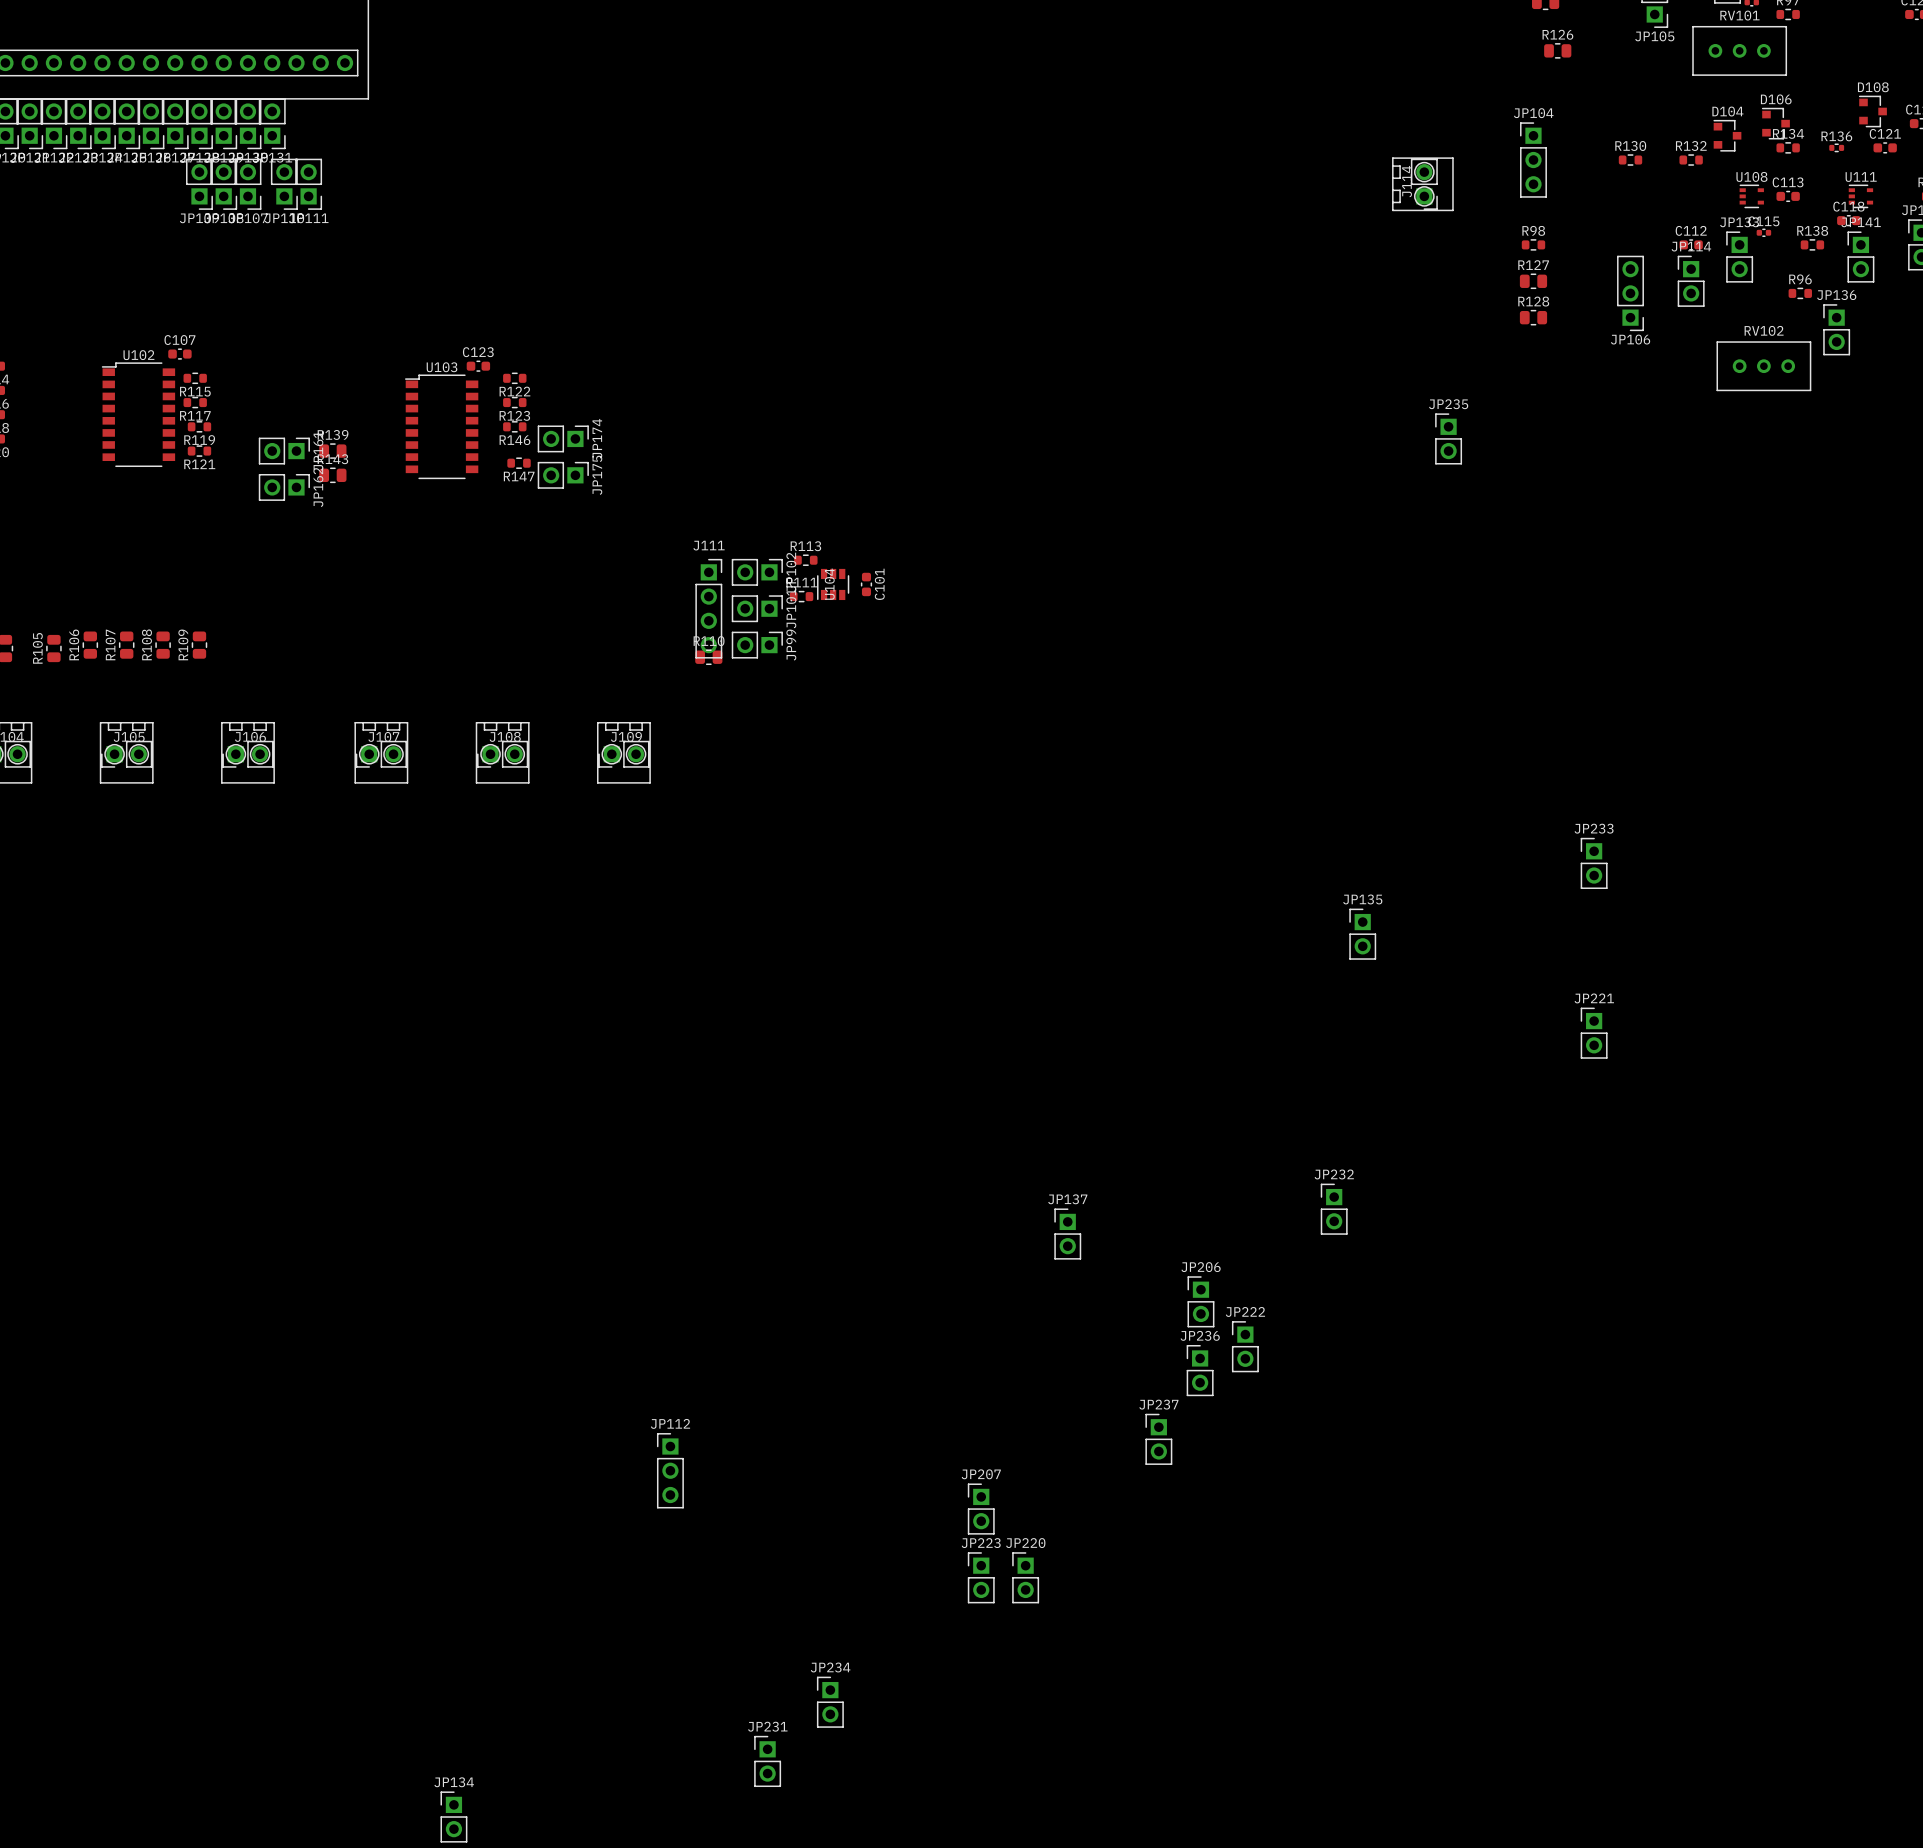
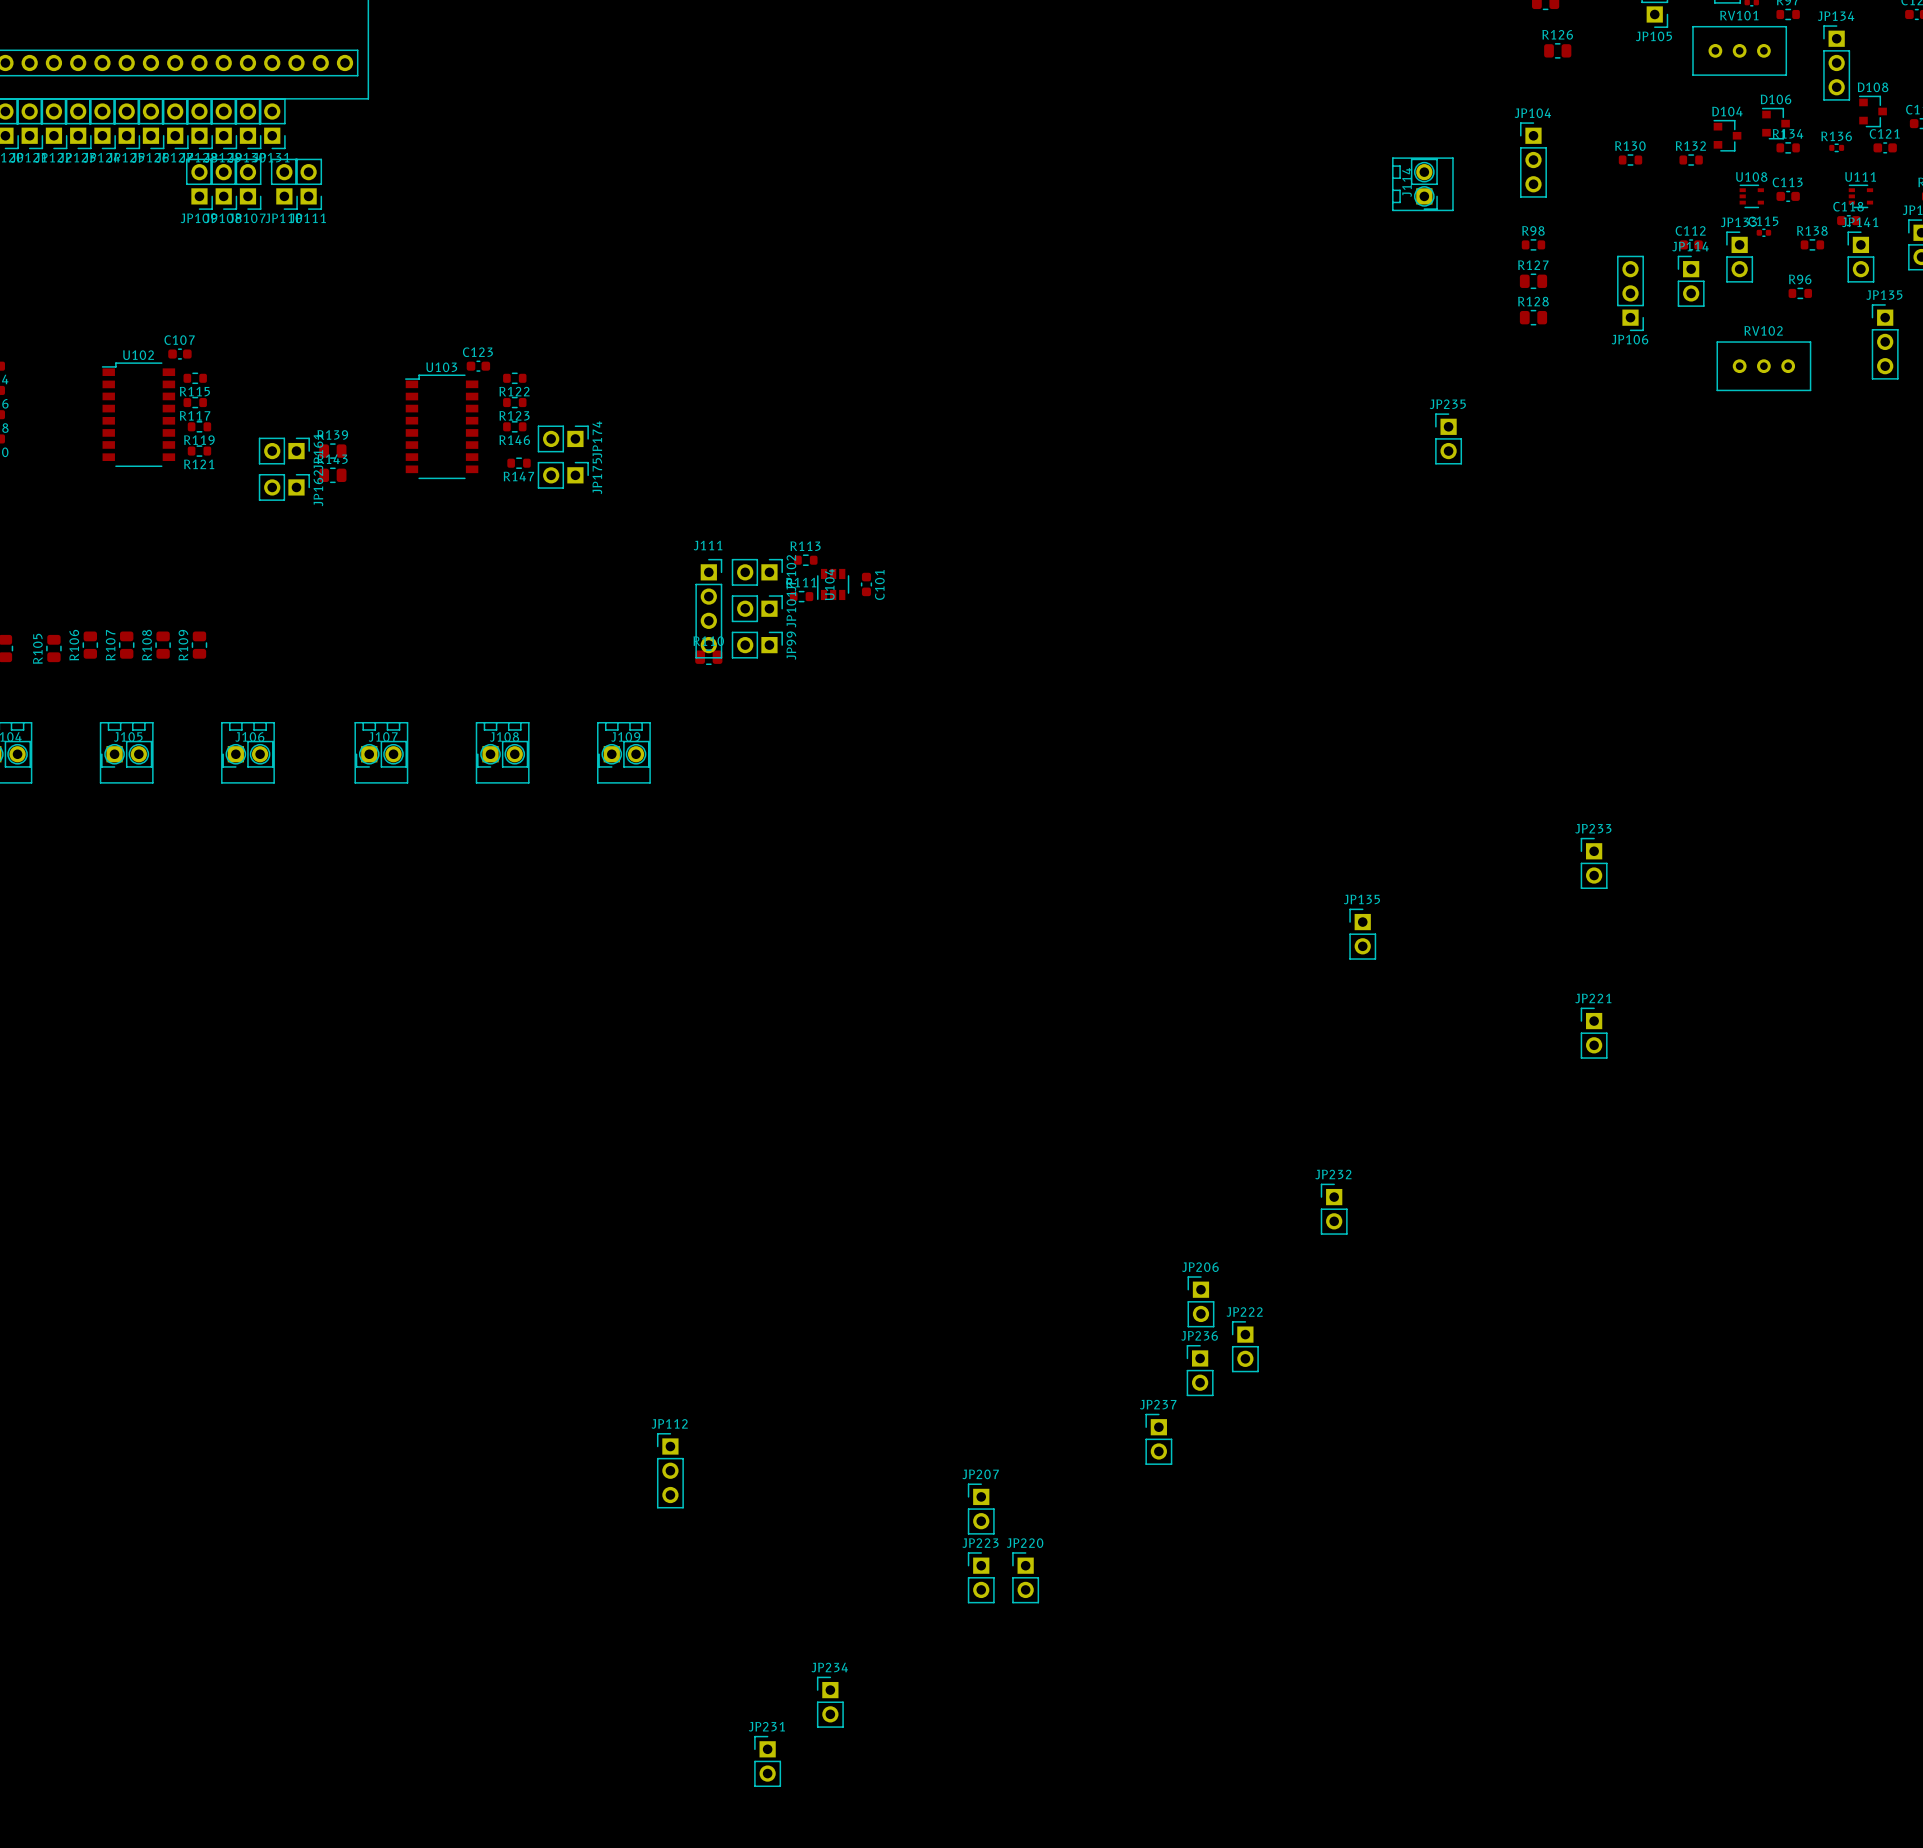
JP136: (1836, 329) -> none
JP135: none -> (1885, 341)
JP137: (1067, 1234) -> none
JP134 footprint: [440, 1791, 468, 1843] -> [1823, 25, 1850, 101]

